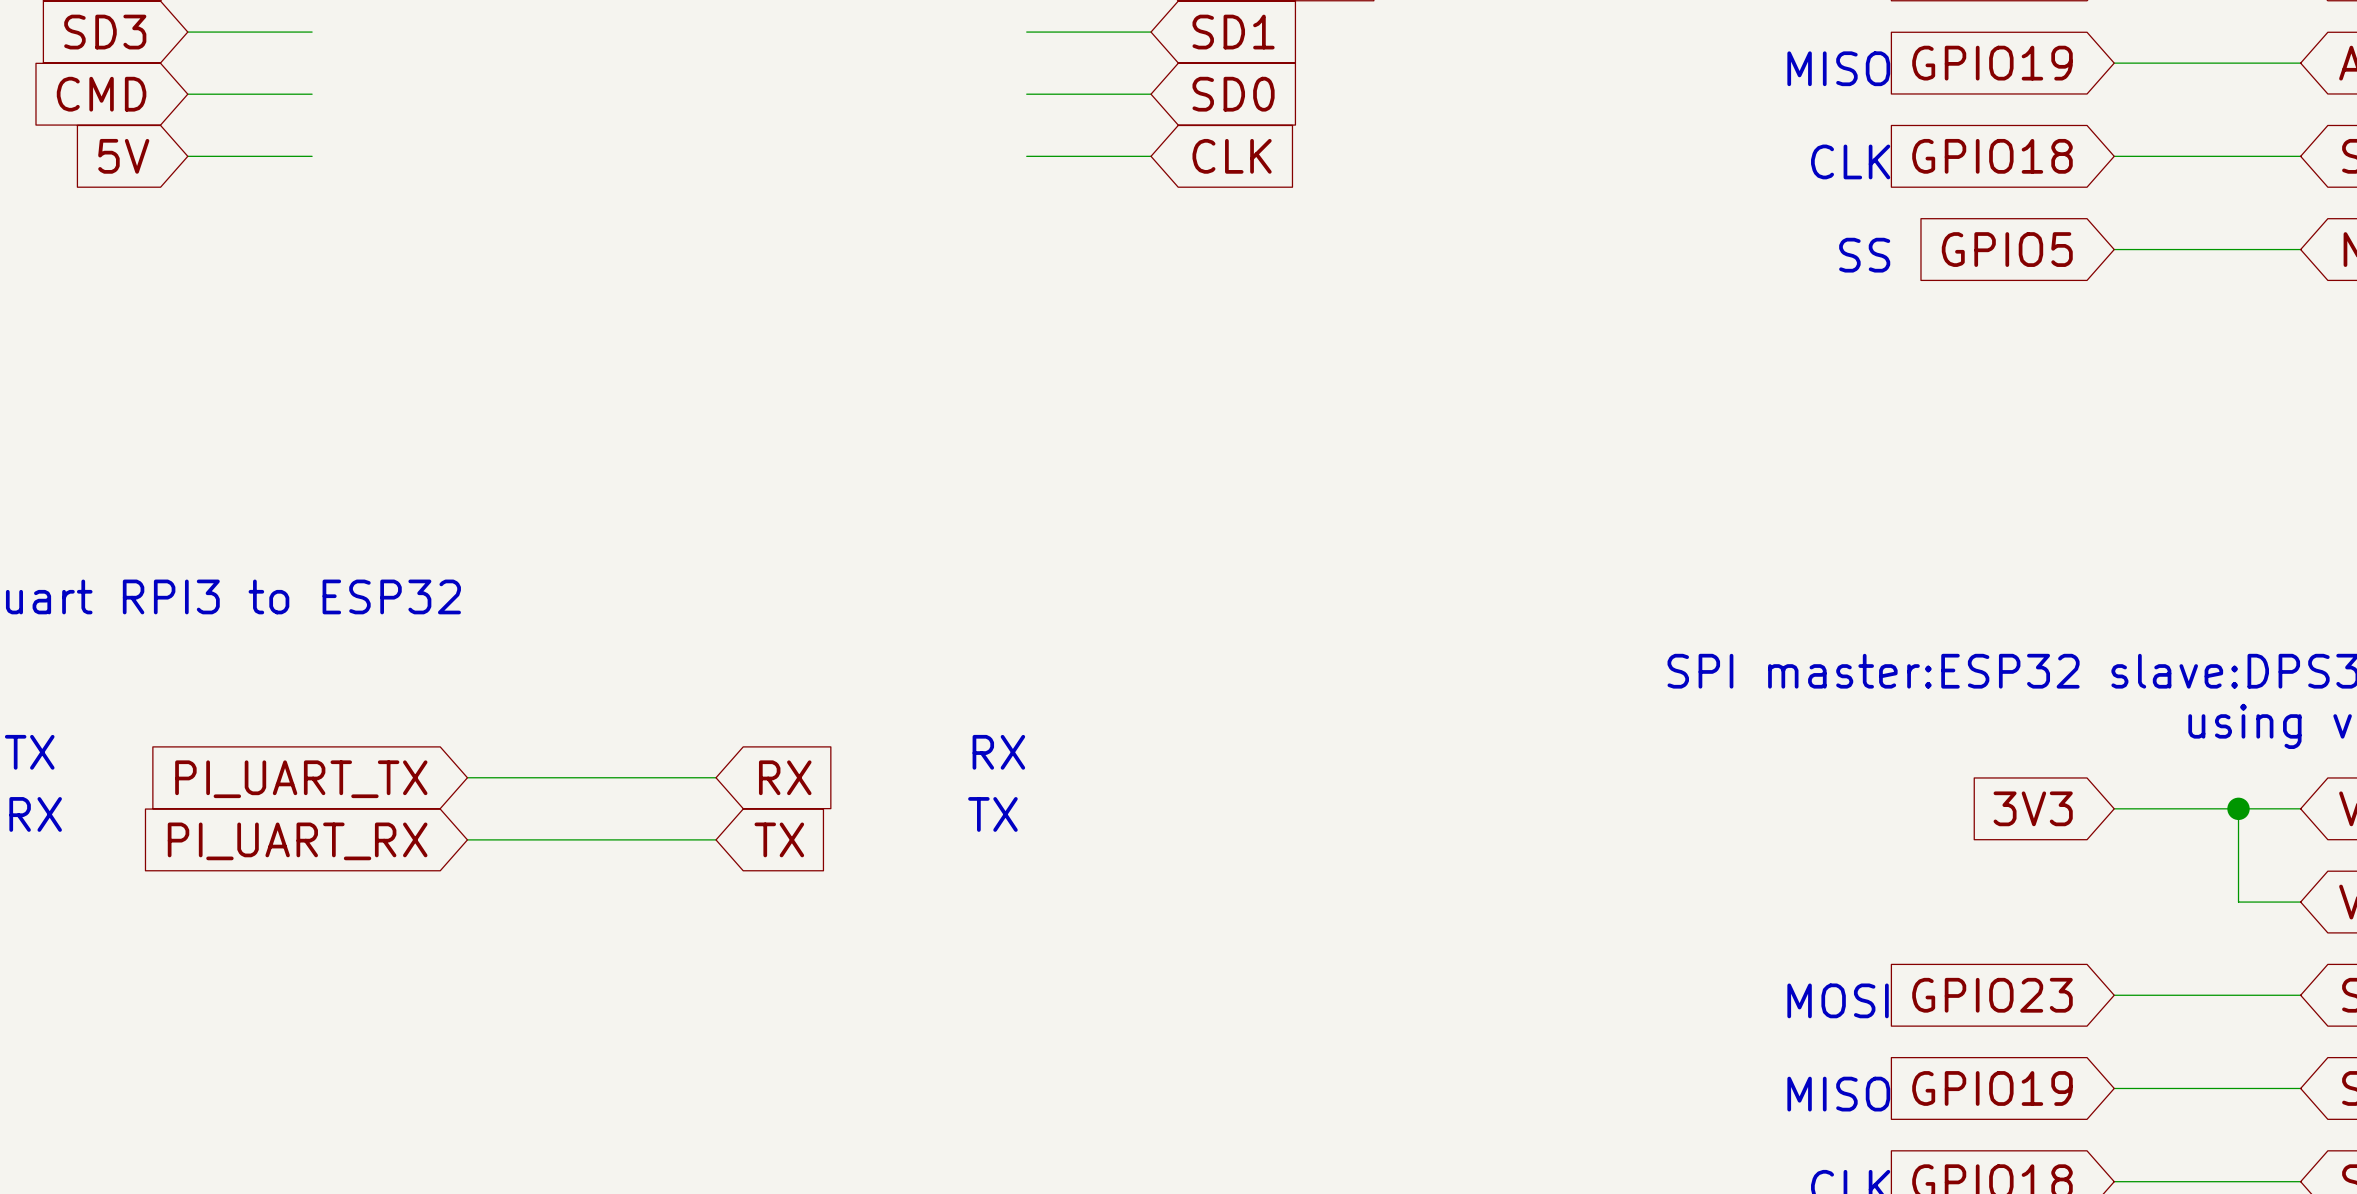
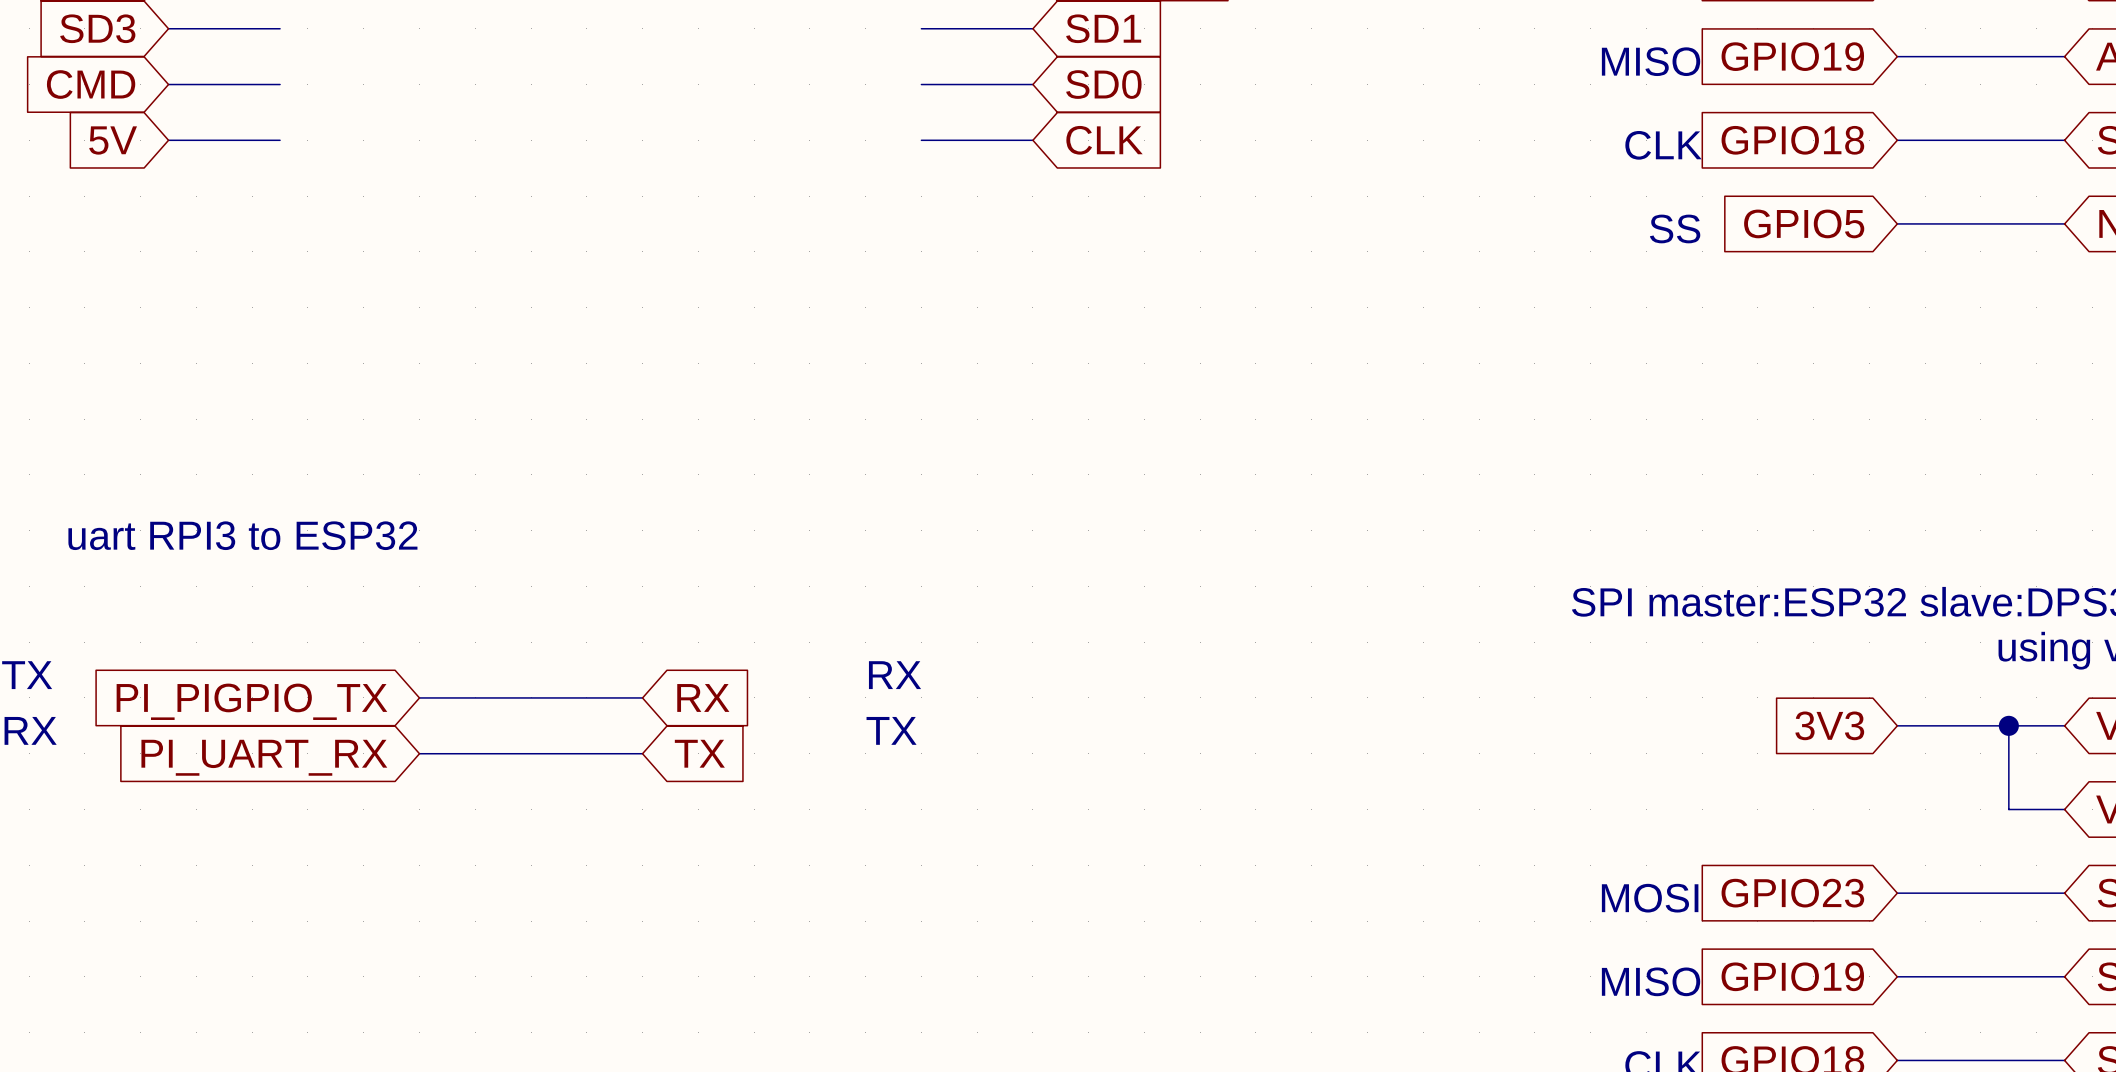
global label: PI_UART_TX (301, 779) -> PI_PIGPIO_TX (251, 701)

